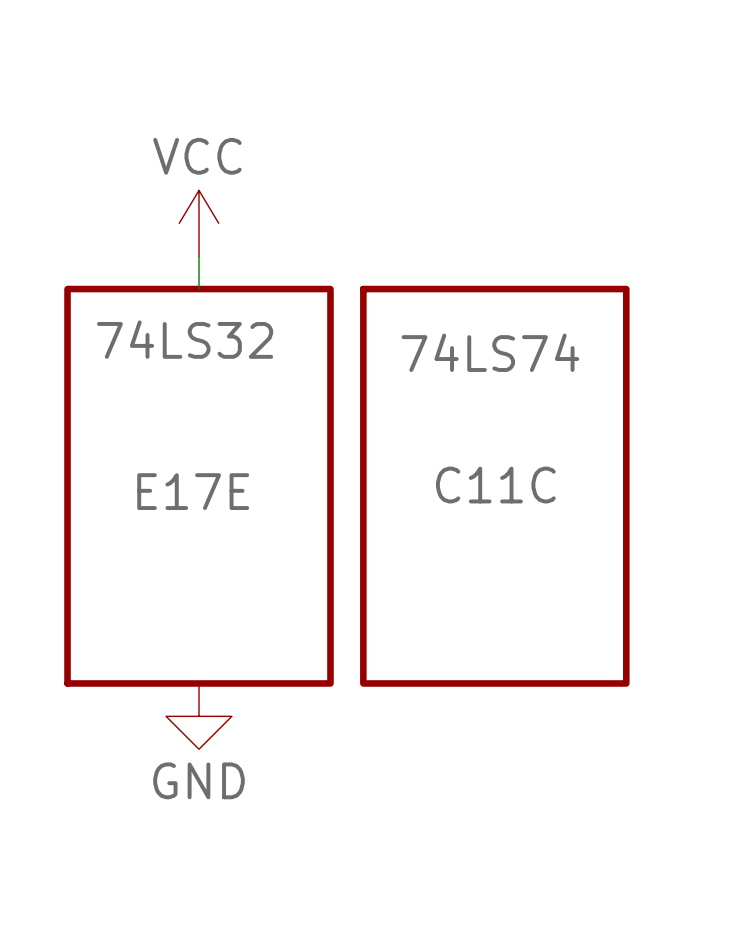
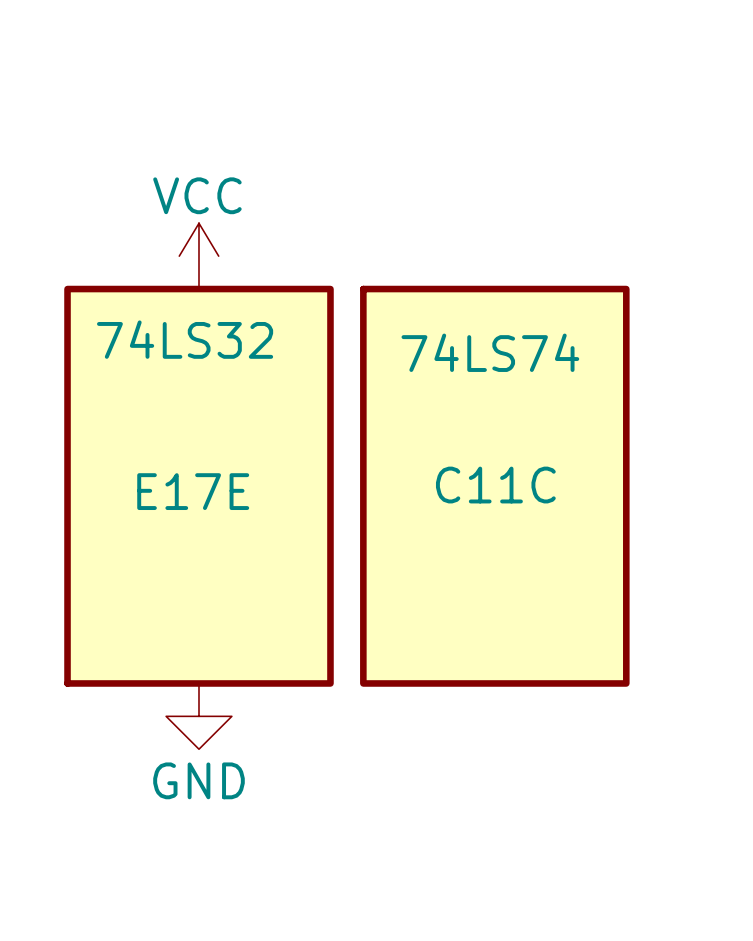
power symbol text position: VCC (197, 156) -> VCC (197, 195)
power symbol position: VCC (198, 223) -> VCC (198, 256)

